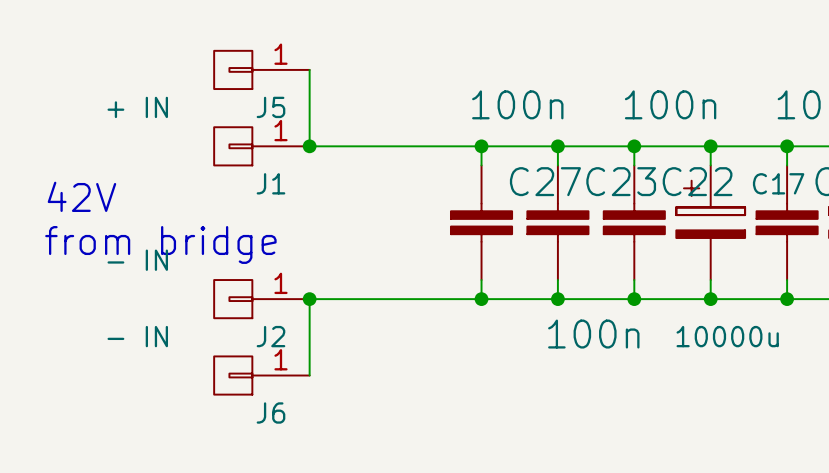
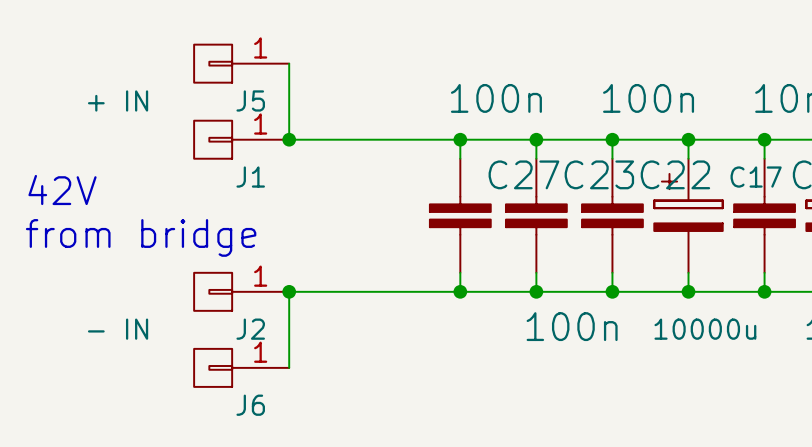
J2 value: - IN (137, 260) -> none

